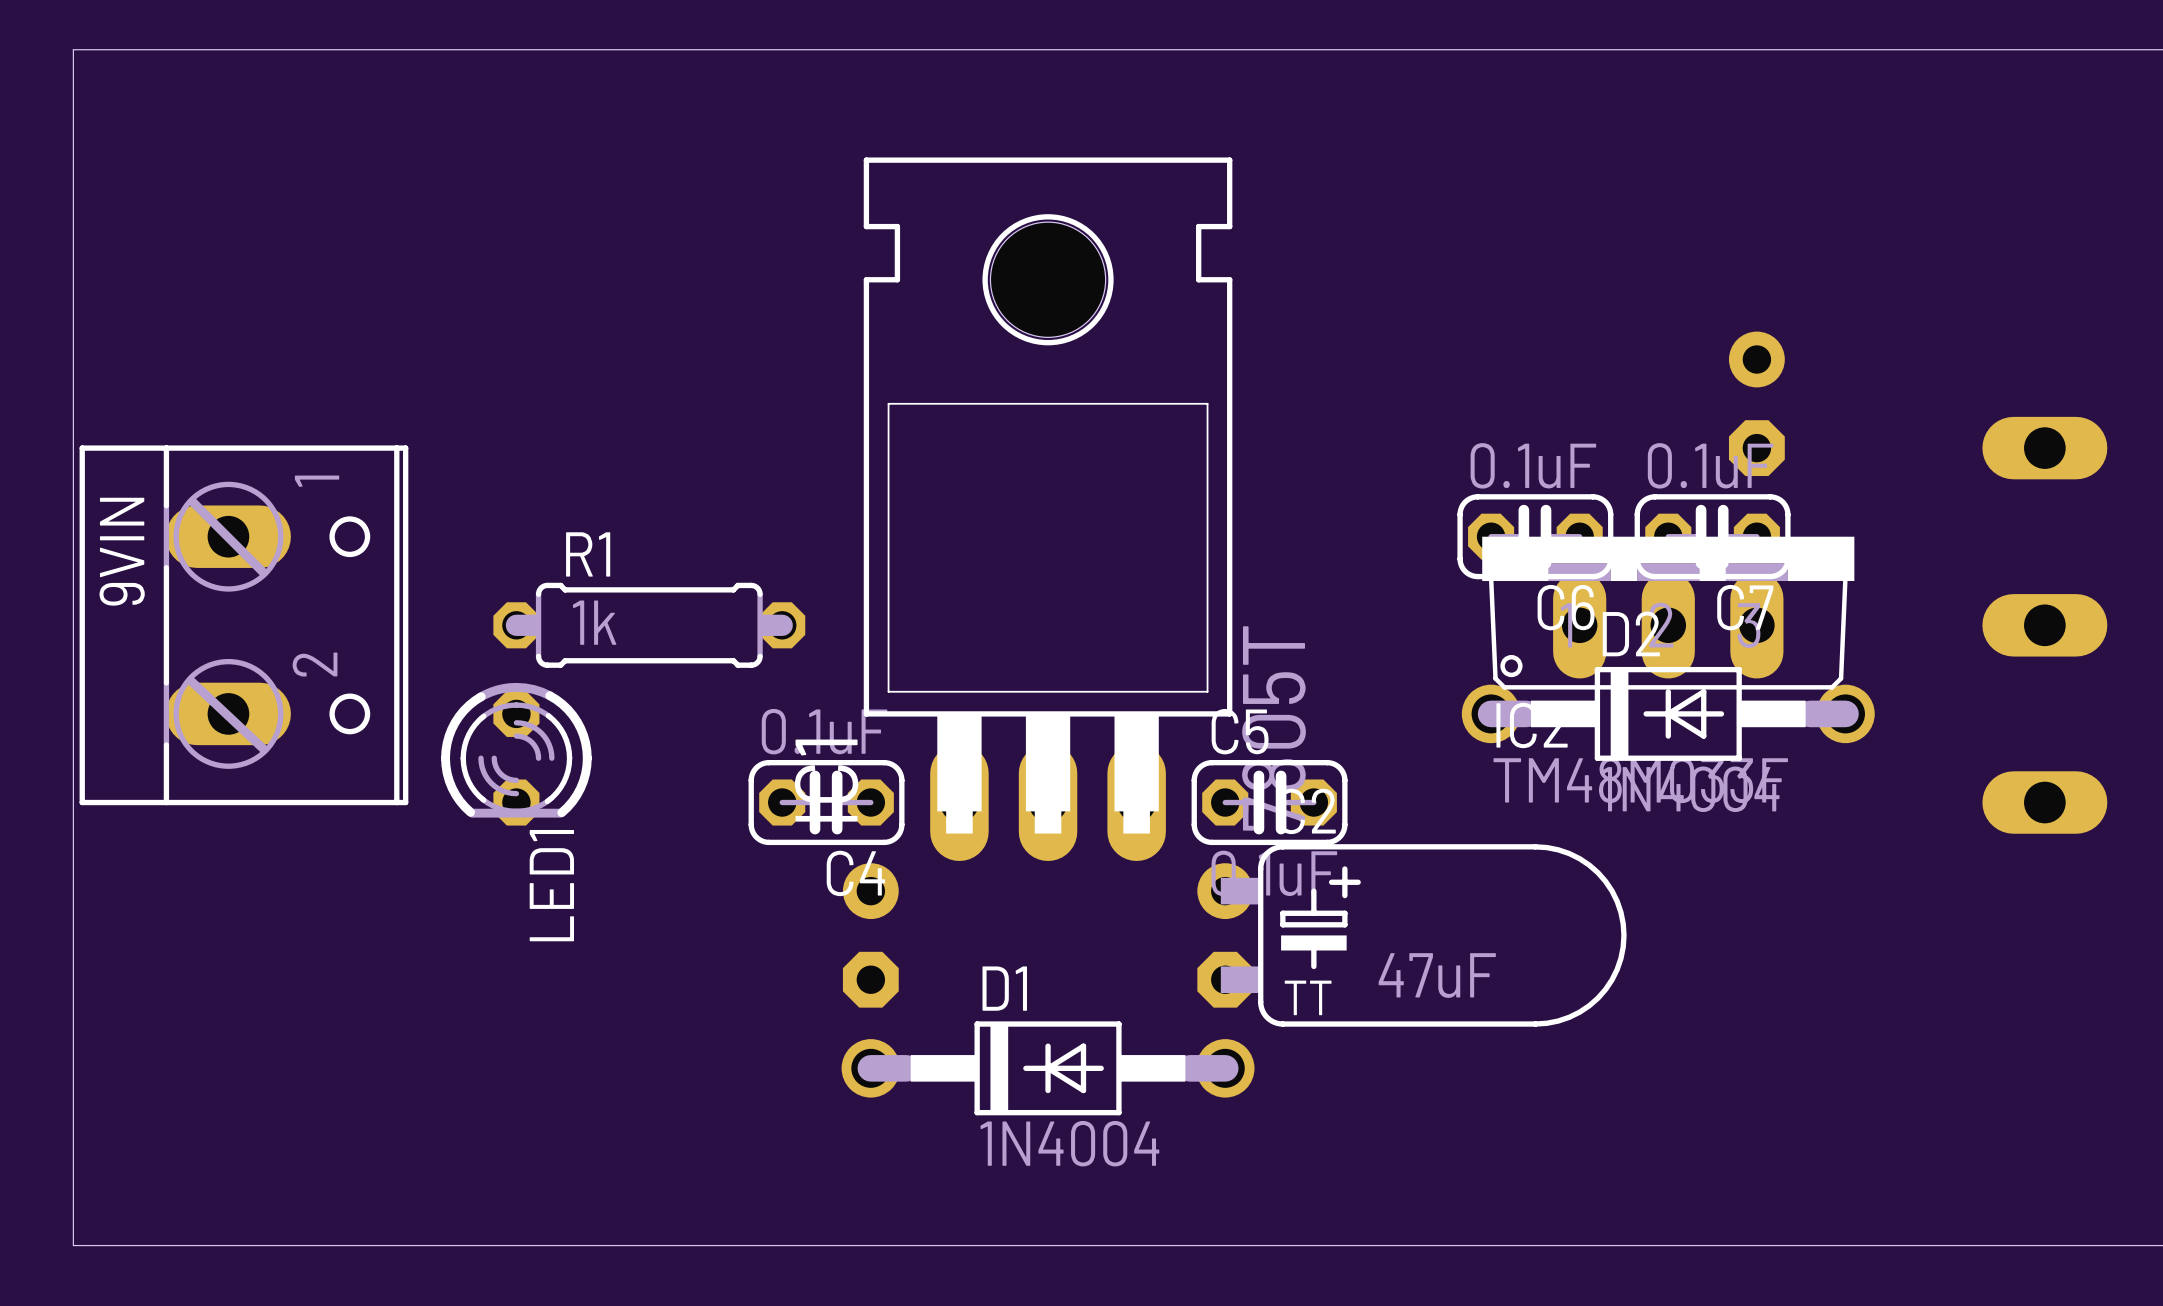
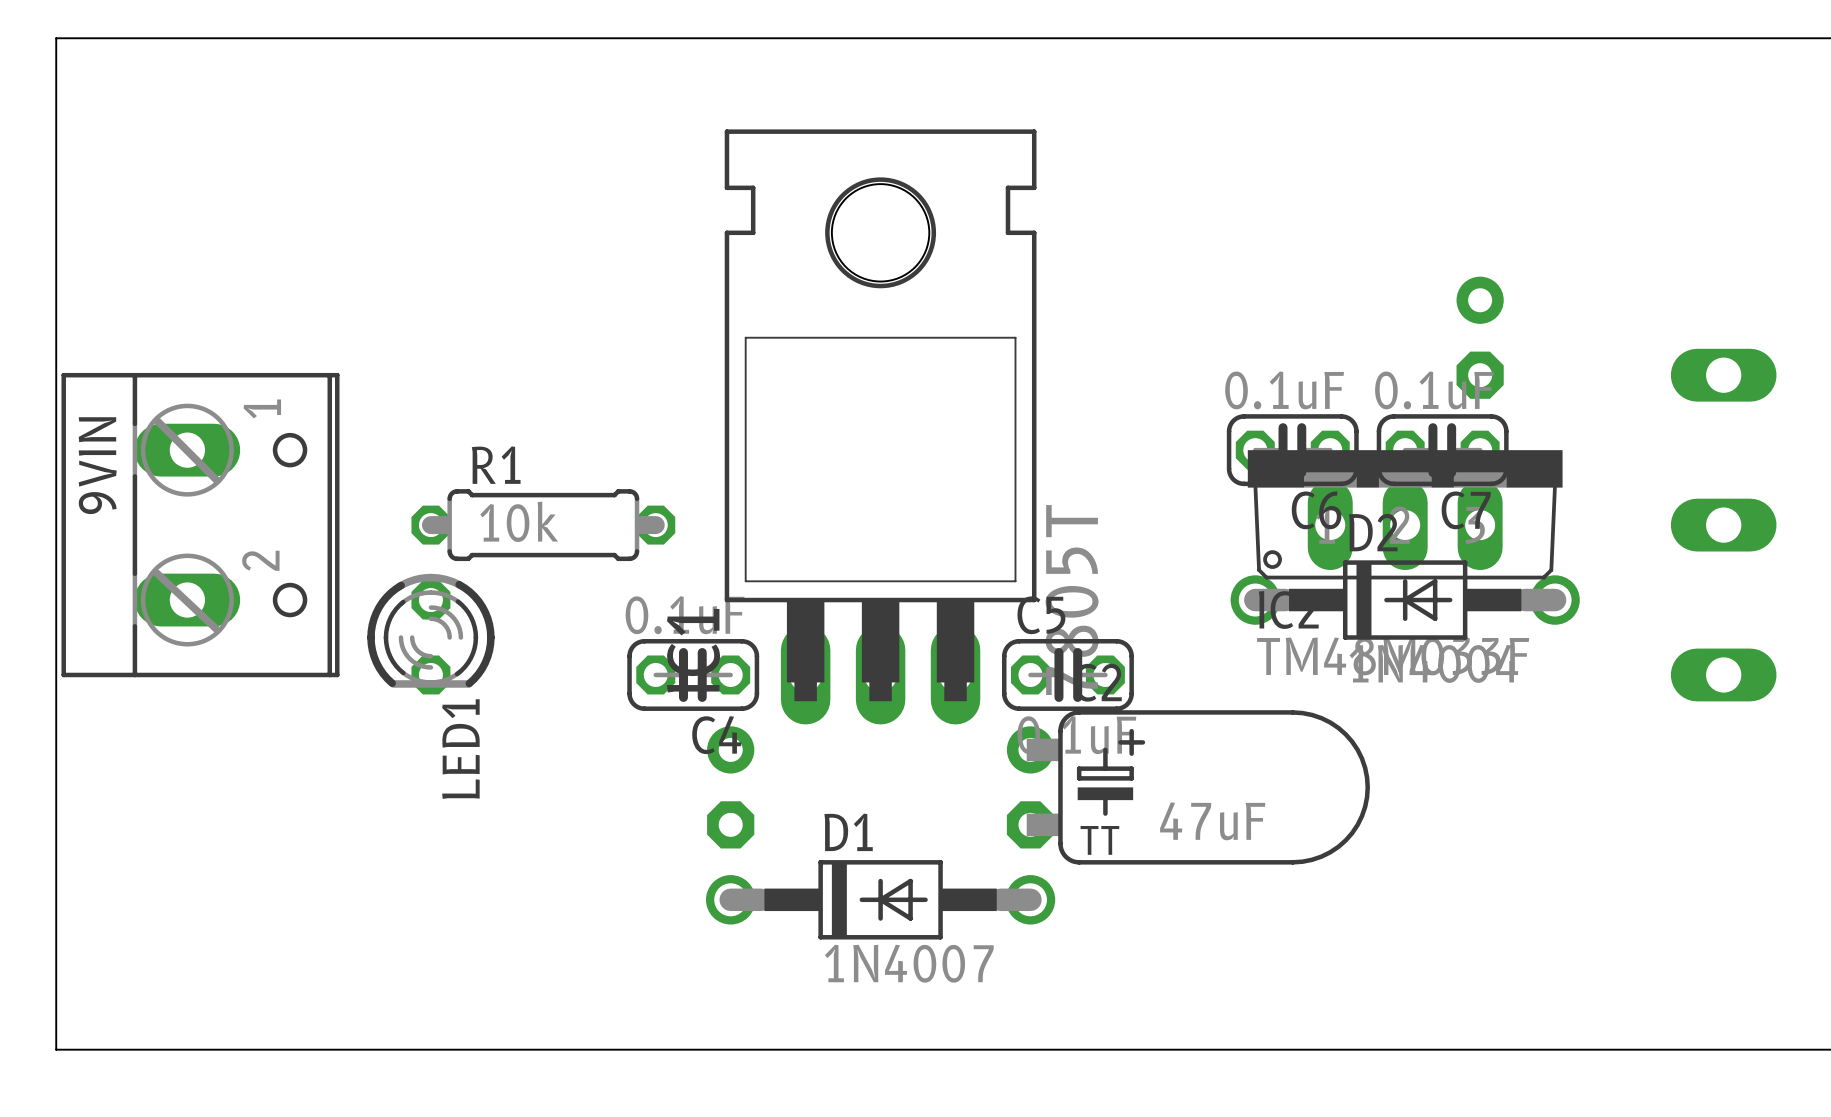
R1 value: 1k (594, 622) -> 10k (519, 521)
D1 value: 1N4004 (1069, 1143) -> 1N4007 (909, 963)

